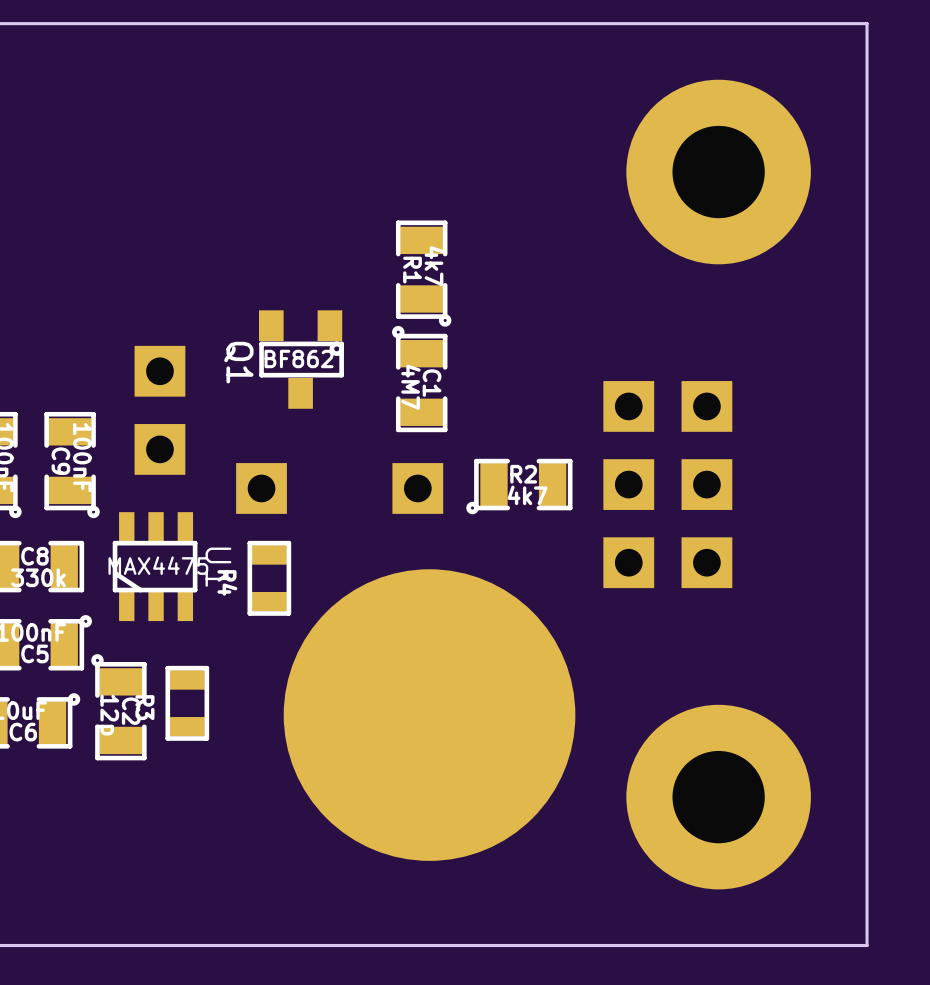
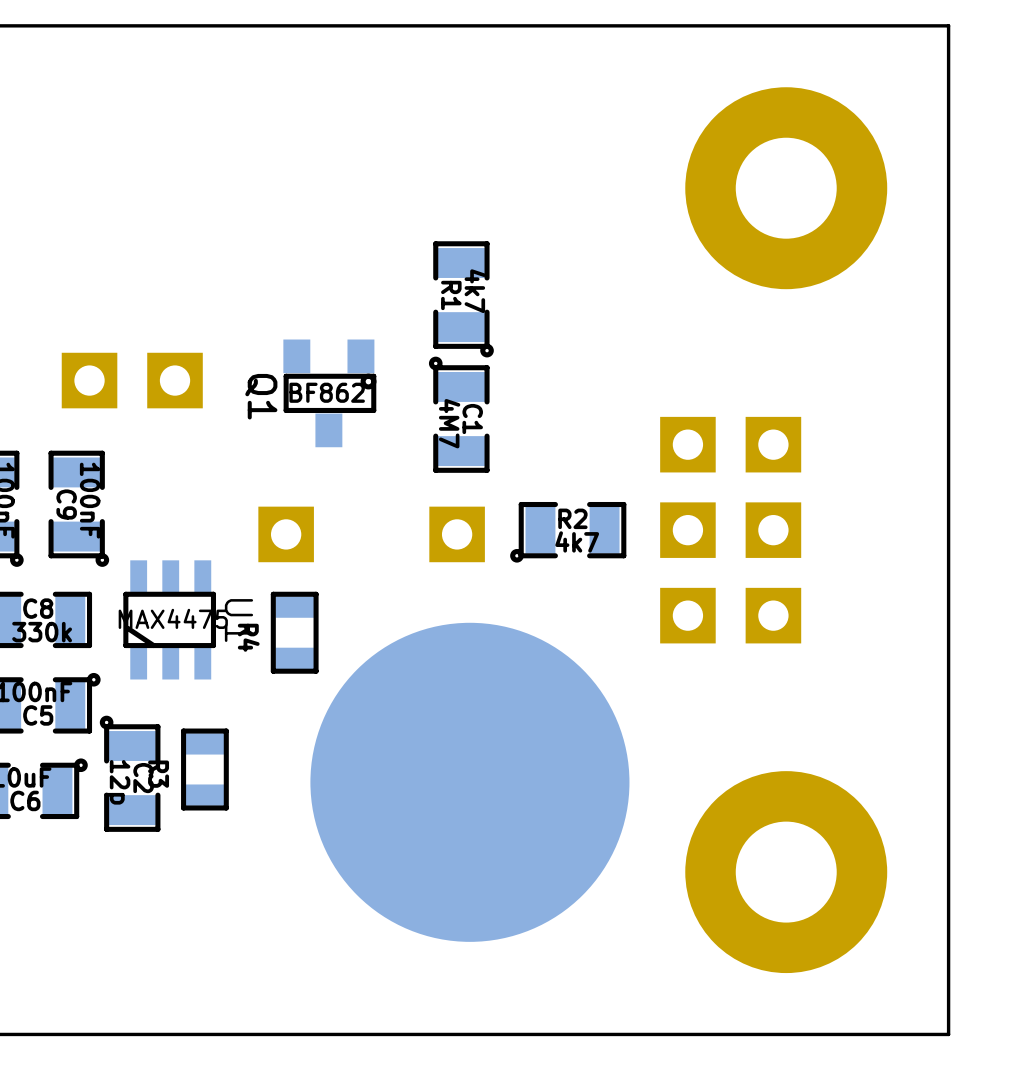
part rotation: 0° (159, 410) -> 90° clockwise (132, 380)

